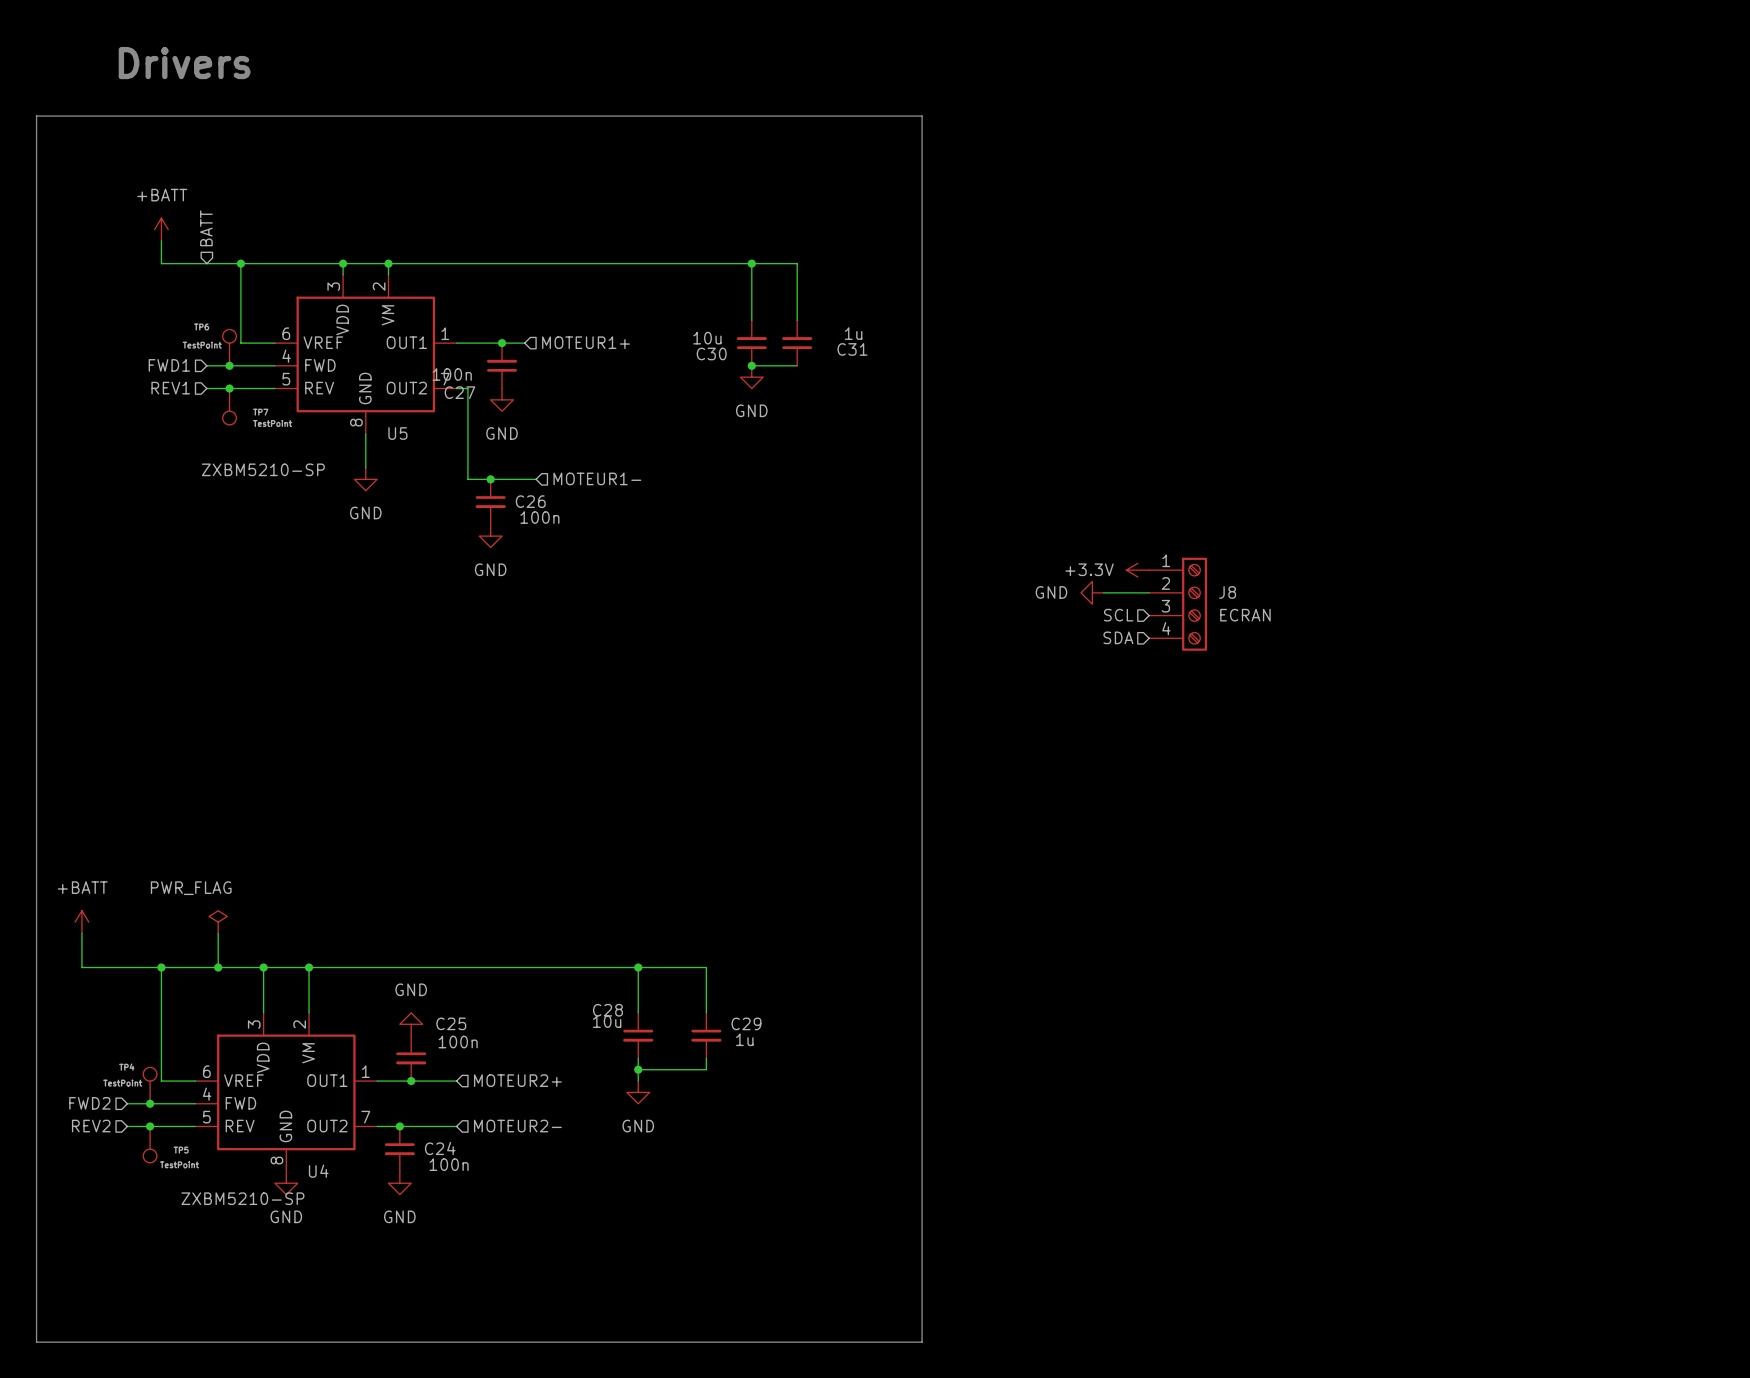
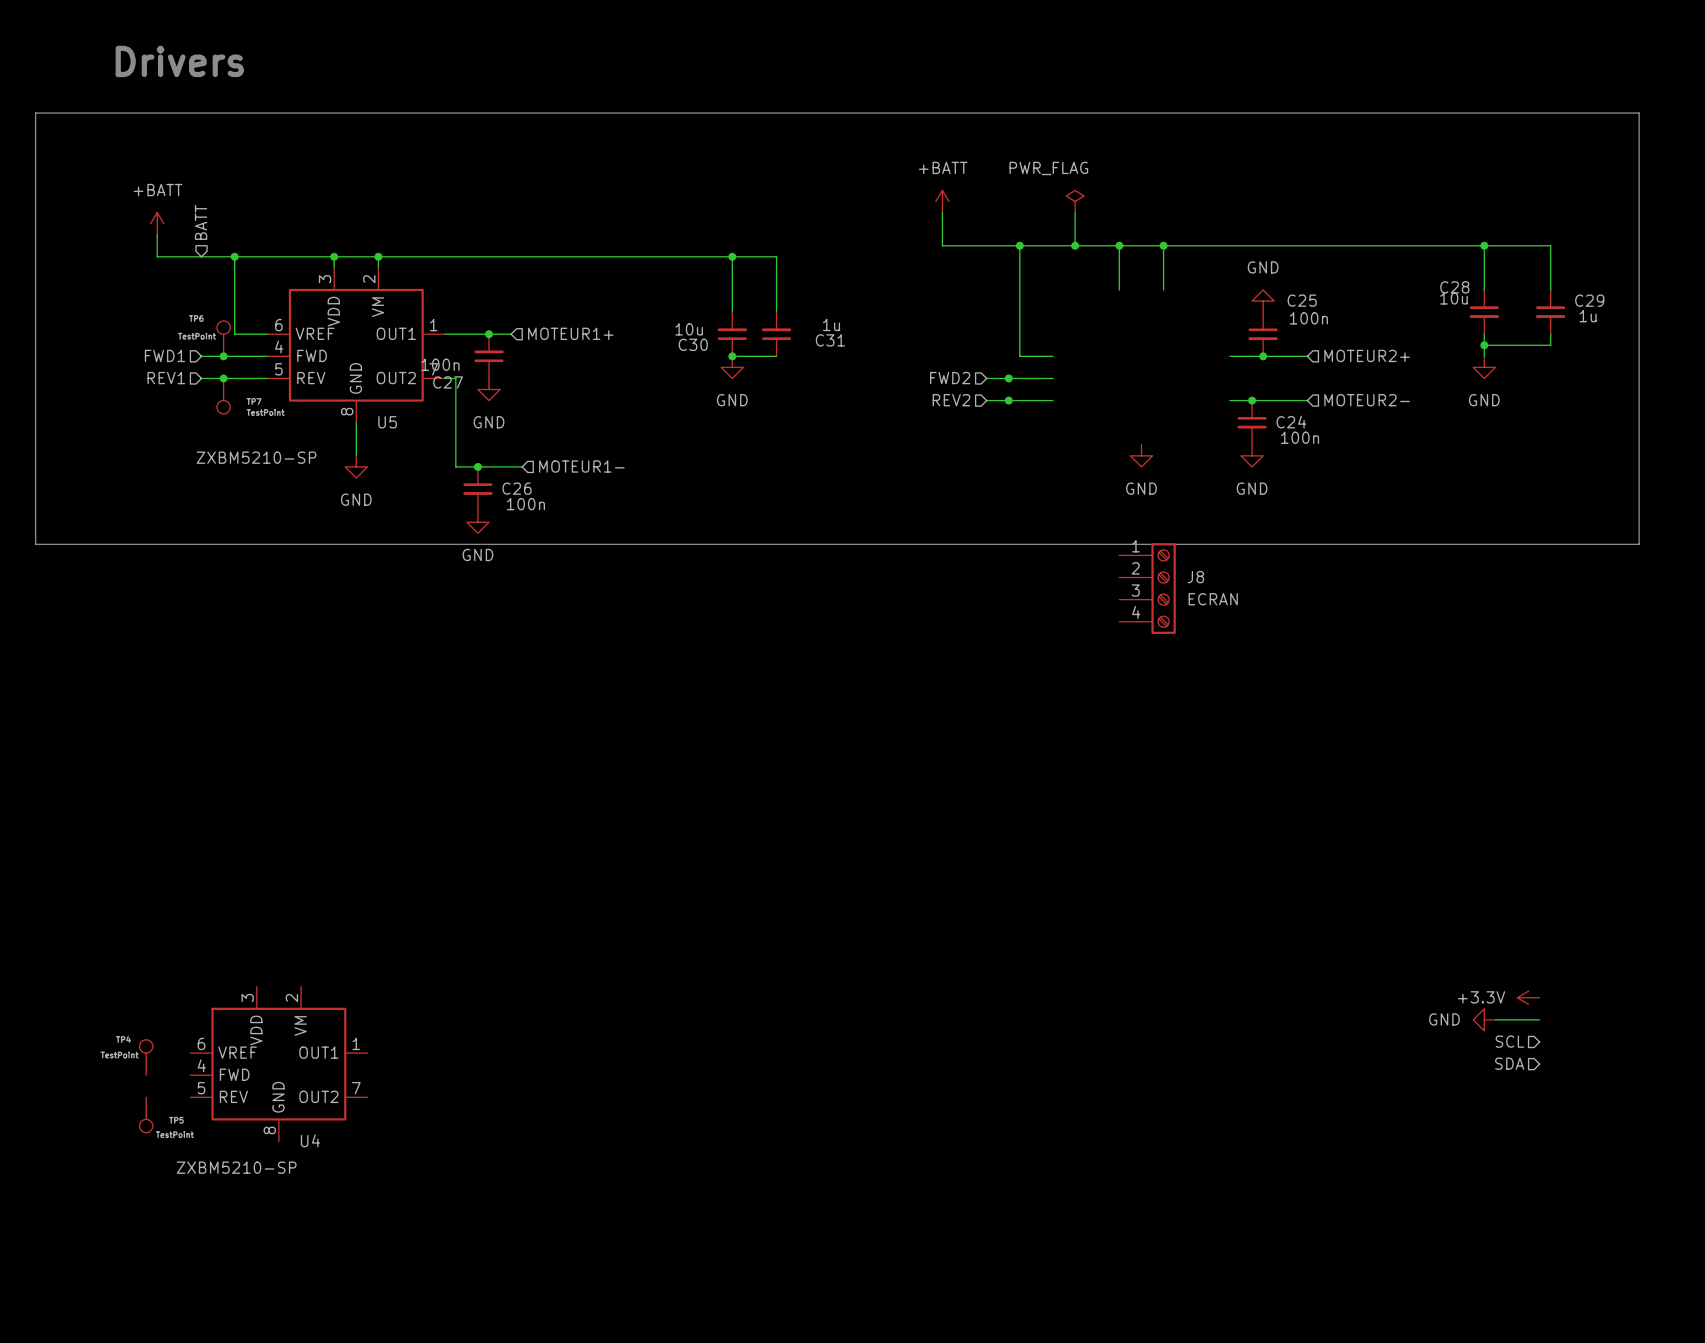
line: (922, 116) (922, 1342) (36, 1342) (36, 558) -> (898, 113) (1639, 113) (1639, 544) (35, 544)
power symbol: none -> +BATT (942, 201)
power symbol: none -> PWR_FLAG (1075, 201)
wire: none -> (942, 212) (942, 245) (1550, 245) (1550, 289)
wire: none -> (1075, 212) (1075, 245)
wire: none -> (1019, 245) (1019, 356) (1053, 356)
junction: none -> (1019, 245)
junction: none -> (1075, 245)
wire: none -> (1119, 245) (1119, 289)
junction: none -> (1119, 245)
wire: none -> (1163, 245) (1163, 289)
junction: none -> (1163, 245)
wire: none -> (1484, 245) (1484, 289)
junction: none -> (1484, 245)
power symbol: none -> GND (1263, 301)
wire: none -> (1484, 334) (1484, 356)
wire: none -> (1550, 334) (1550, 345) (1484, 345)
junction: none -> (1484, 345)
wire: none -> (1229, 356) (1307, 356)
junction: none -> (1263, 356)
hierarchical label: none -> MOTEUR2+ (1367, 355)
power symbol: none -> GND (1484, 367)
hierarchical label: none -> FWD2 (950, 378)
wire: none -> (986, 378) (1053, 378)
junction: none -> (1008, 378)
hierarchical label: none -> REV2 (951, 400)
hierarchical label: none -> MOTEUR2- (1367, 400)
wire: none -> (986, 400) (1053, 400)
junction: none -> (1008, 400)
wire: none -> (1229, 400) (1307, 400)
junction: none -> (1252, 400)
power symbol: none -> GND (1141, 455)
power symbol: none -> GND (1252, 455)
power symbol: +3.3V (1137, 570) -> none
power symbol: GND (1092, 592) -> none
wire: (1103, 592) (1149, 592) -> none
hierarchical label: SCL (1118, 615) -> none
hierarchical label: SDA (1118, 637) -> none
power symbol: +BATT (81, 922) -> none
power symbol: PWR_FLAG (218, 922) -> none
wire: (81, 933) (81, 967) (706, 967) (706, 1012) -> none
wire: (218, 933) (218, 967) -> none
wire: (161, 967) (161, 1081) (195, 1081) -> none
junction: (161, 967) -> none
junction: (218, 967) -> none
wire: (263, 967) (263, 1012) -> none
junction: (263, 967) -> none
wire: (309, 967) (309, 1012) -> none
junction: (309, 967) -> none
wire: (638, 967) (638, 1012) -> none
junction: (638, 967) -> none
power symbol: GND (411, 1024) -> none
power symbol: none -> +3.3V (1528, 997)
C28 position: (638, 1035) -> (1484, 312)
C29 position: (706, 1035) -> (1550, 312)
power symbol: none -> GND (1484, 1019)
wire: none -> (1495, 1019) (1539, 1019)
C25 position: (411, 1058) -> (1263, 334)
wire: (638, 1058) (638, 1081) -> none
wire: (706, 1058) (706, 1069) (638, 1069) -> none
junction: (638, 1069) -> none
hierarchical label: none -> SCL (1509, 1041)
hierarchical label: MOTEUR2+ (517, 1080) -> none
wire: (377, 1081) (456, 1081) -> none
junction: (411, 1081) -> none
hierarchical label: none -> SDA (1509, 1063)
power symbol: GND (638, 1092) -> none
hierarchical label: FWD2 (89, 1103) -> none
wire: (127, 1103) (195, 1103) -> none
junction: (150, 1103) -> none
hierarchical label: REV2 (91, 1126) -> none
wire: (127, 1126) (195, 1126) -> none
junction: (150, 1126) -> none
wire: (377, 1126) (456, 1126) -> none
junction: (399, 1126) -> none
hierarchical label: MOTEUR2- (517, 1126) -> none
C24 position: (399, 1149) -> (1252, 422)
power symbol: GND (286, 1183) -> none
power symbol: GND (399, 1183) -> none

